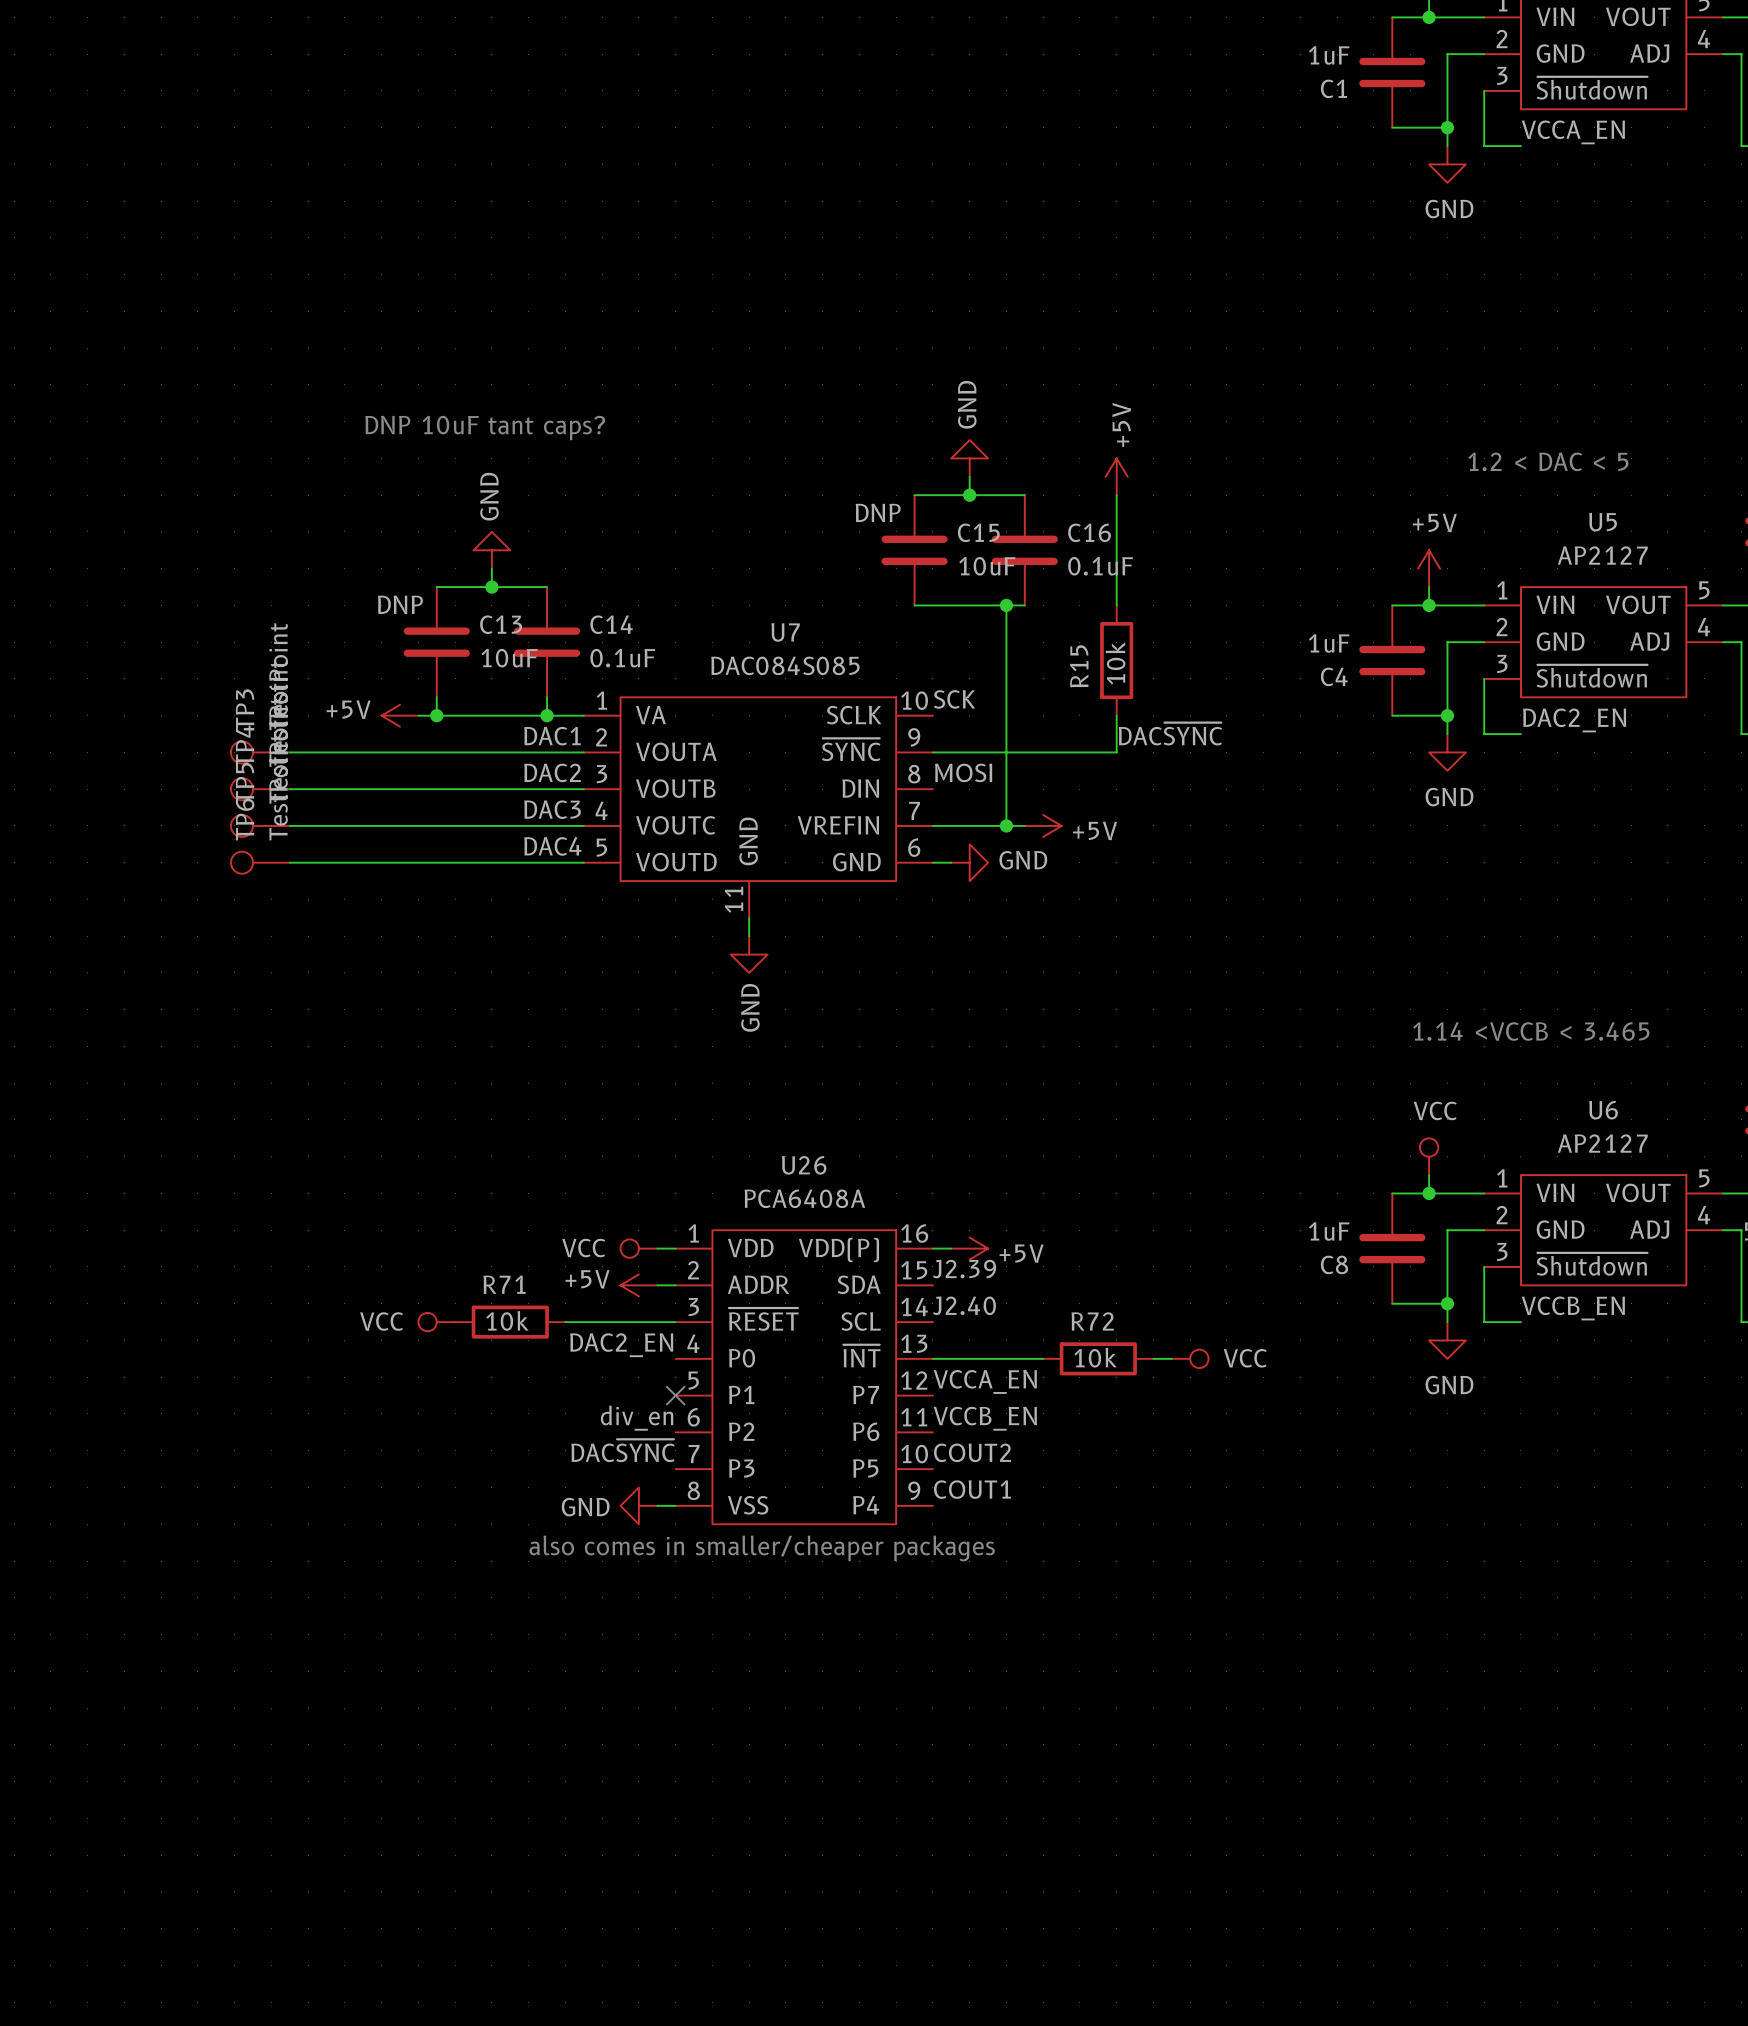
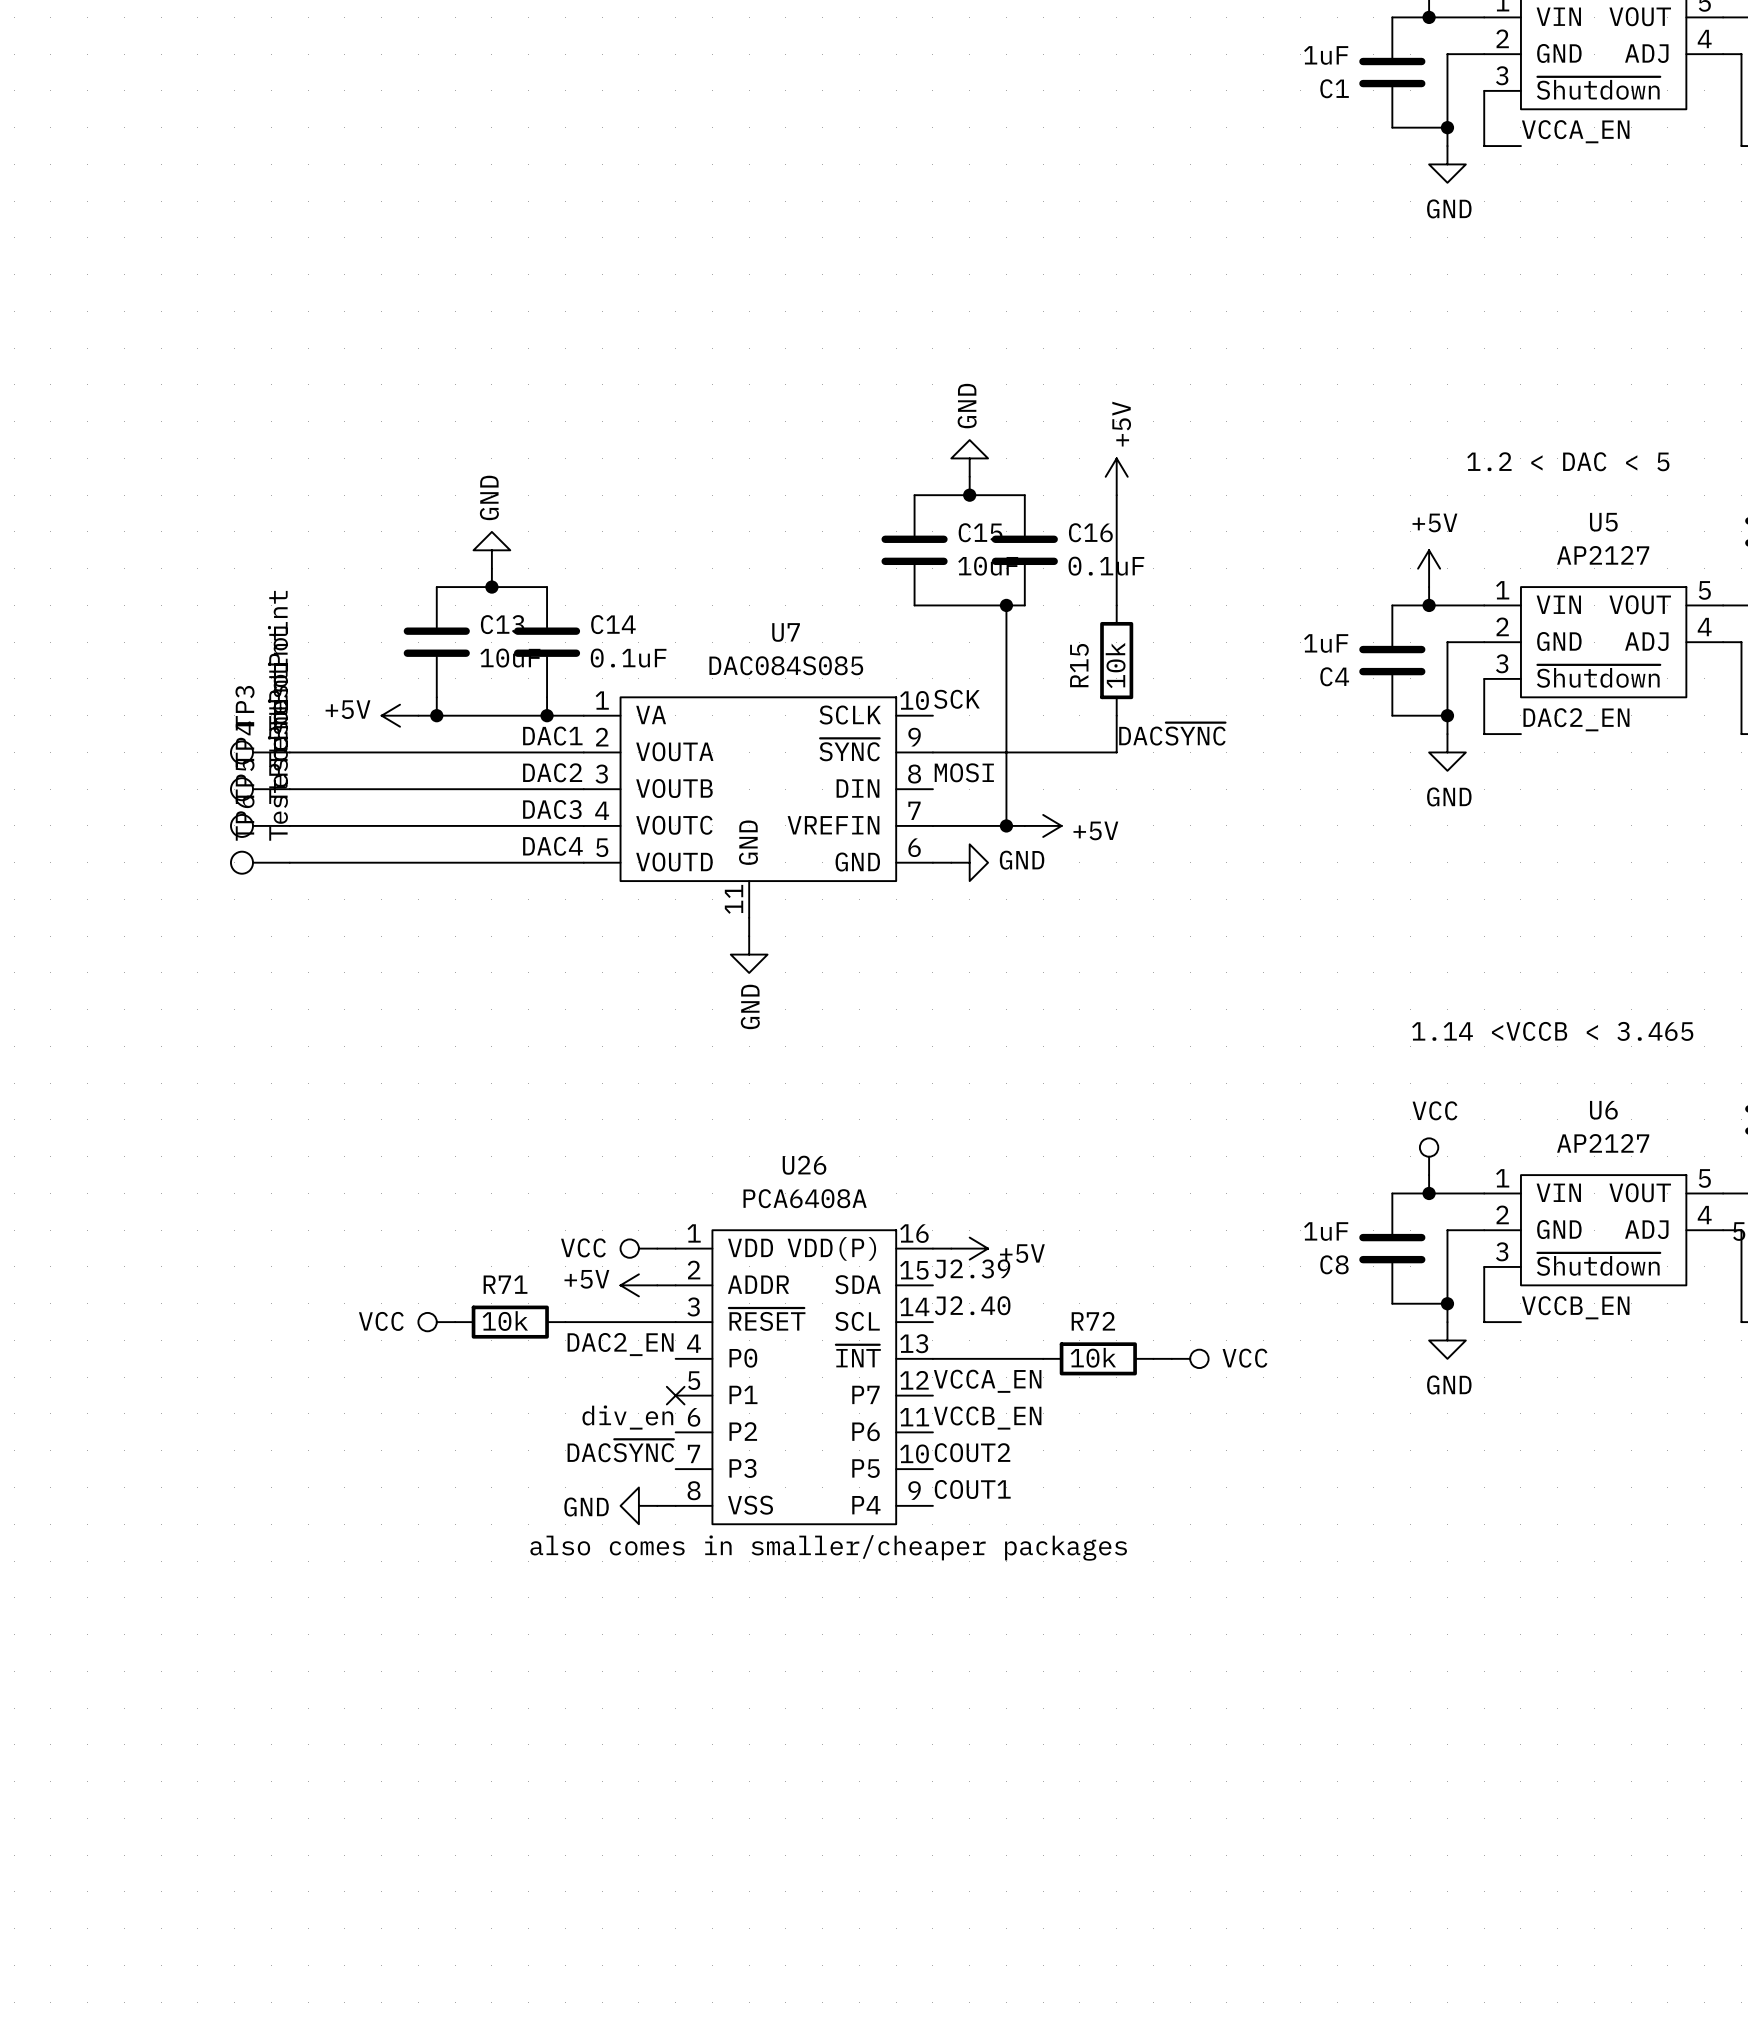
text: DNP 10uF tant caps? (485, 428) -> none
C15 text: DNP (878, 512) -> none
C13 text: DNP (400, 604) -> none

